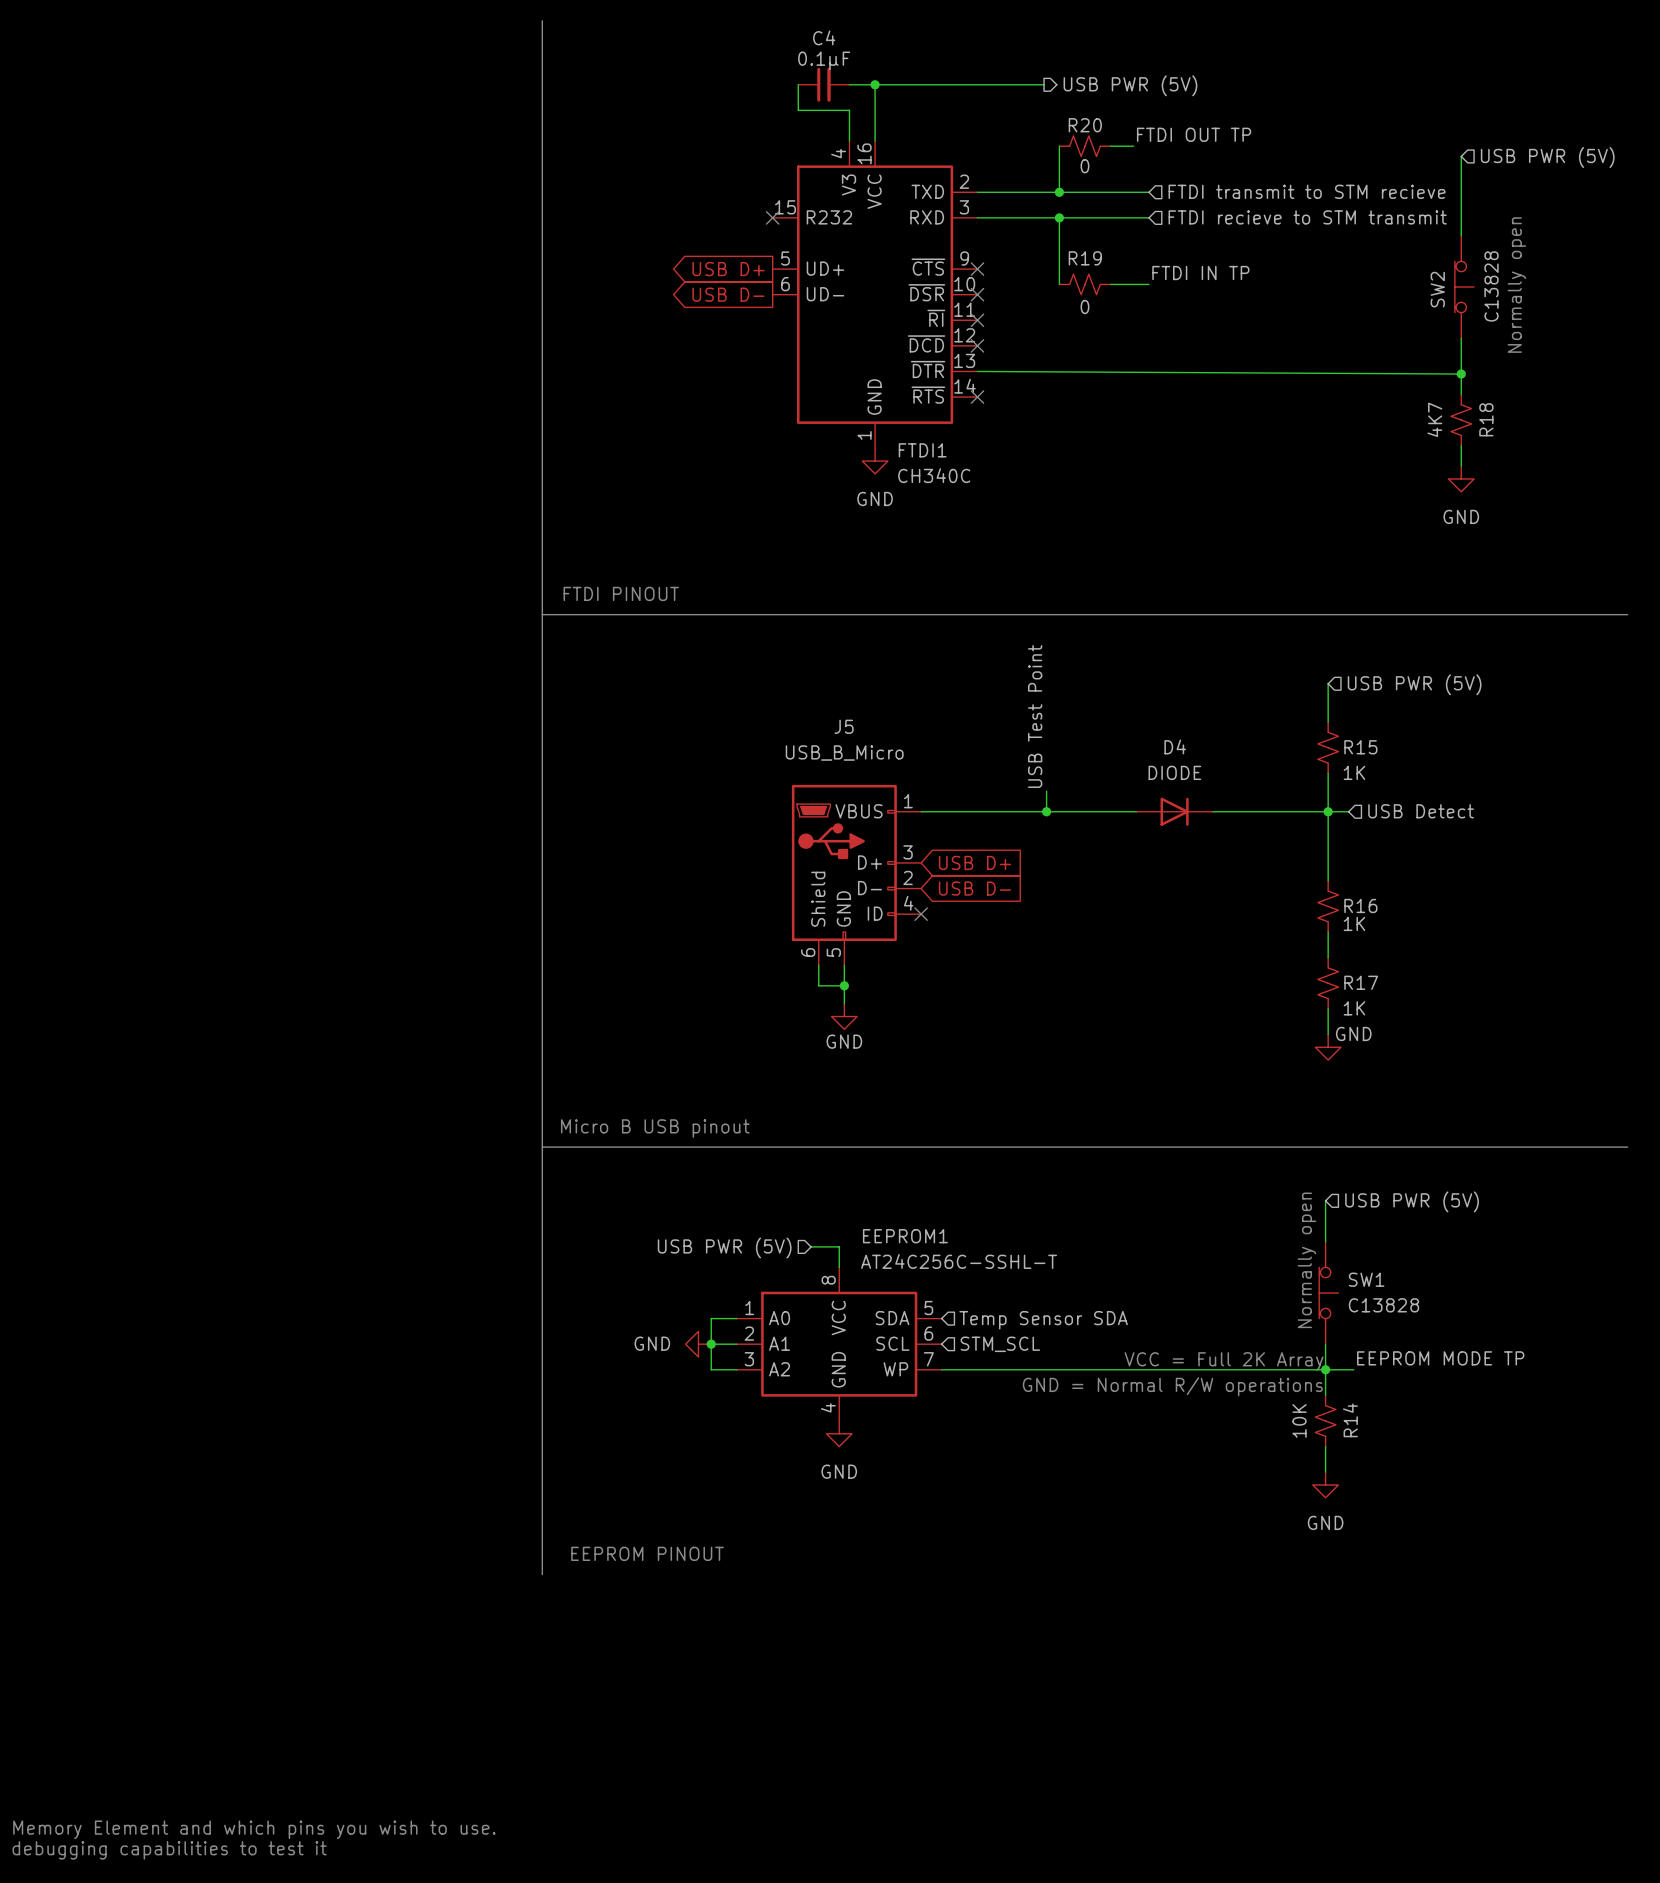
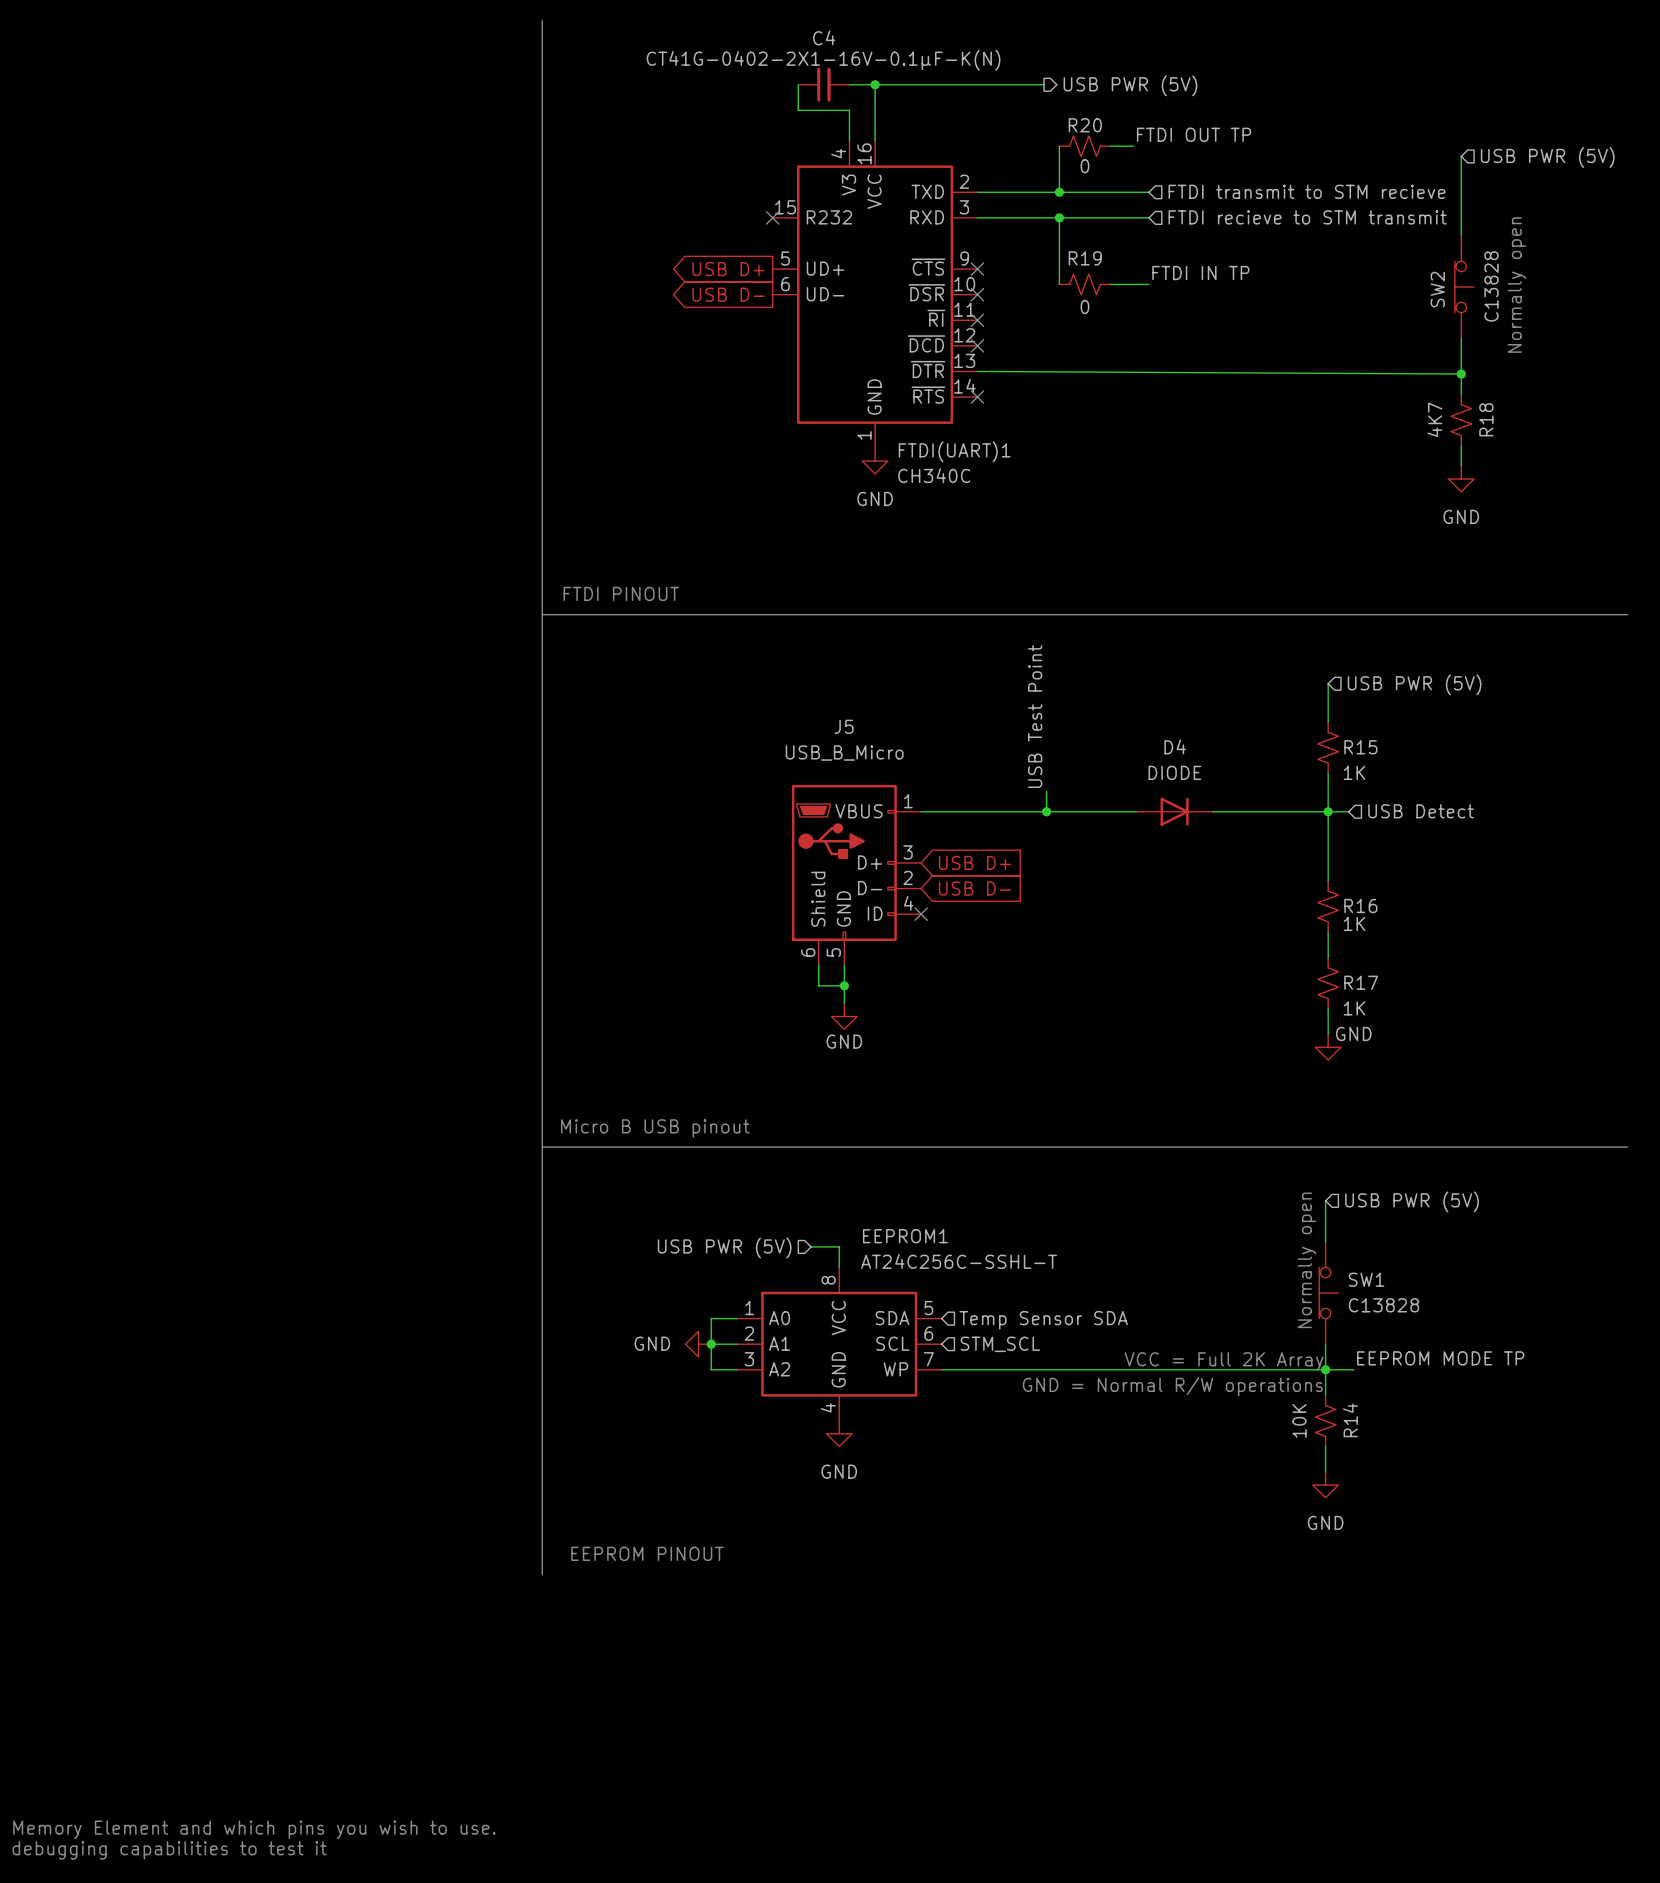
C4 value: 0.1μF (824, 60) -> CT41G-0402-2X1-16V-0.1μF-K(N) (823, 60)
FTDI1 name: FTDI1 (922, 450) -> FTDI(UART)1 (954, 451)

